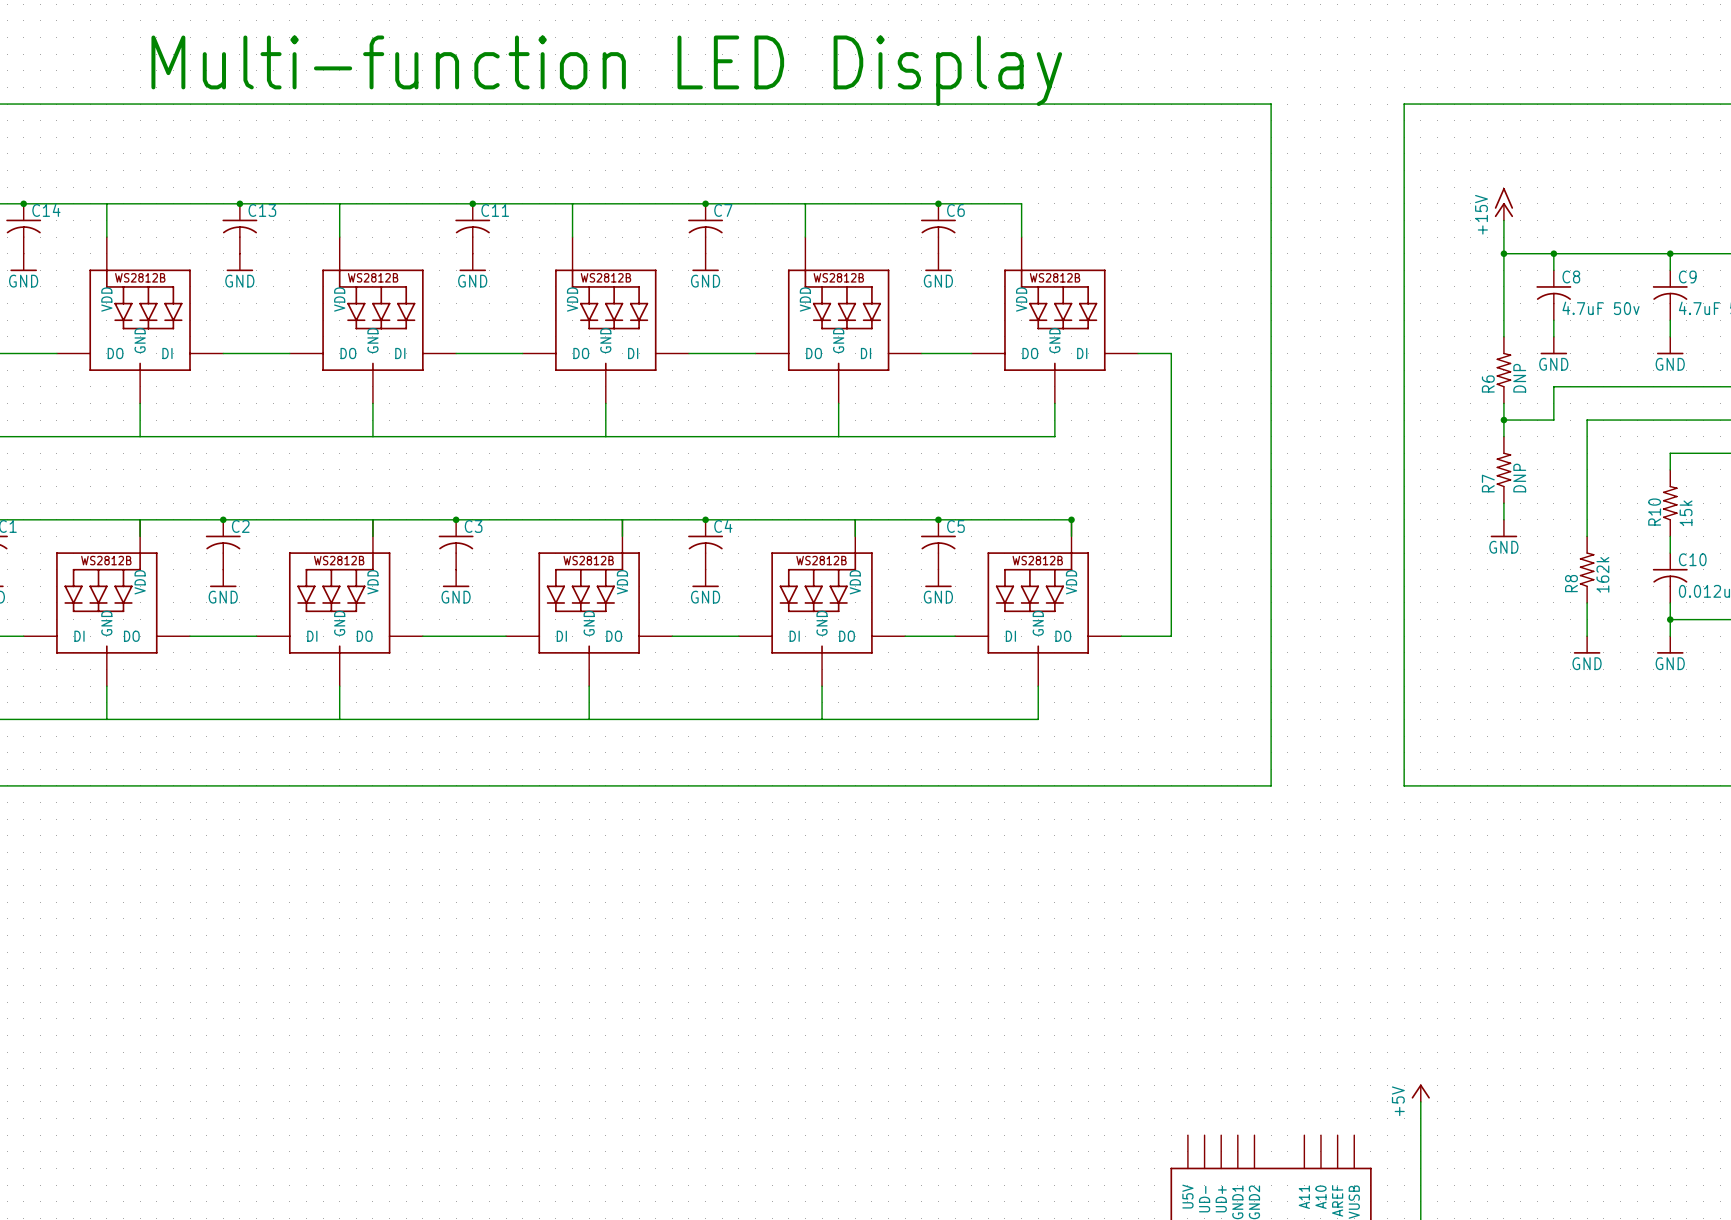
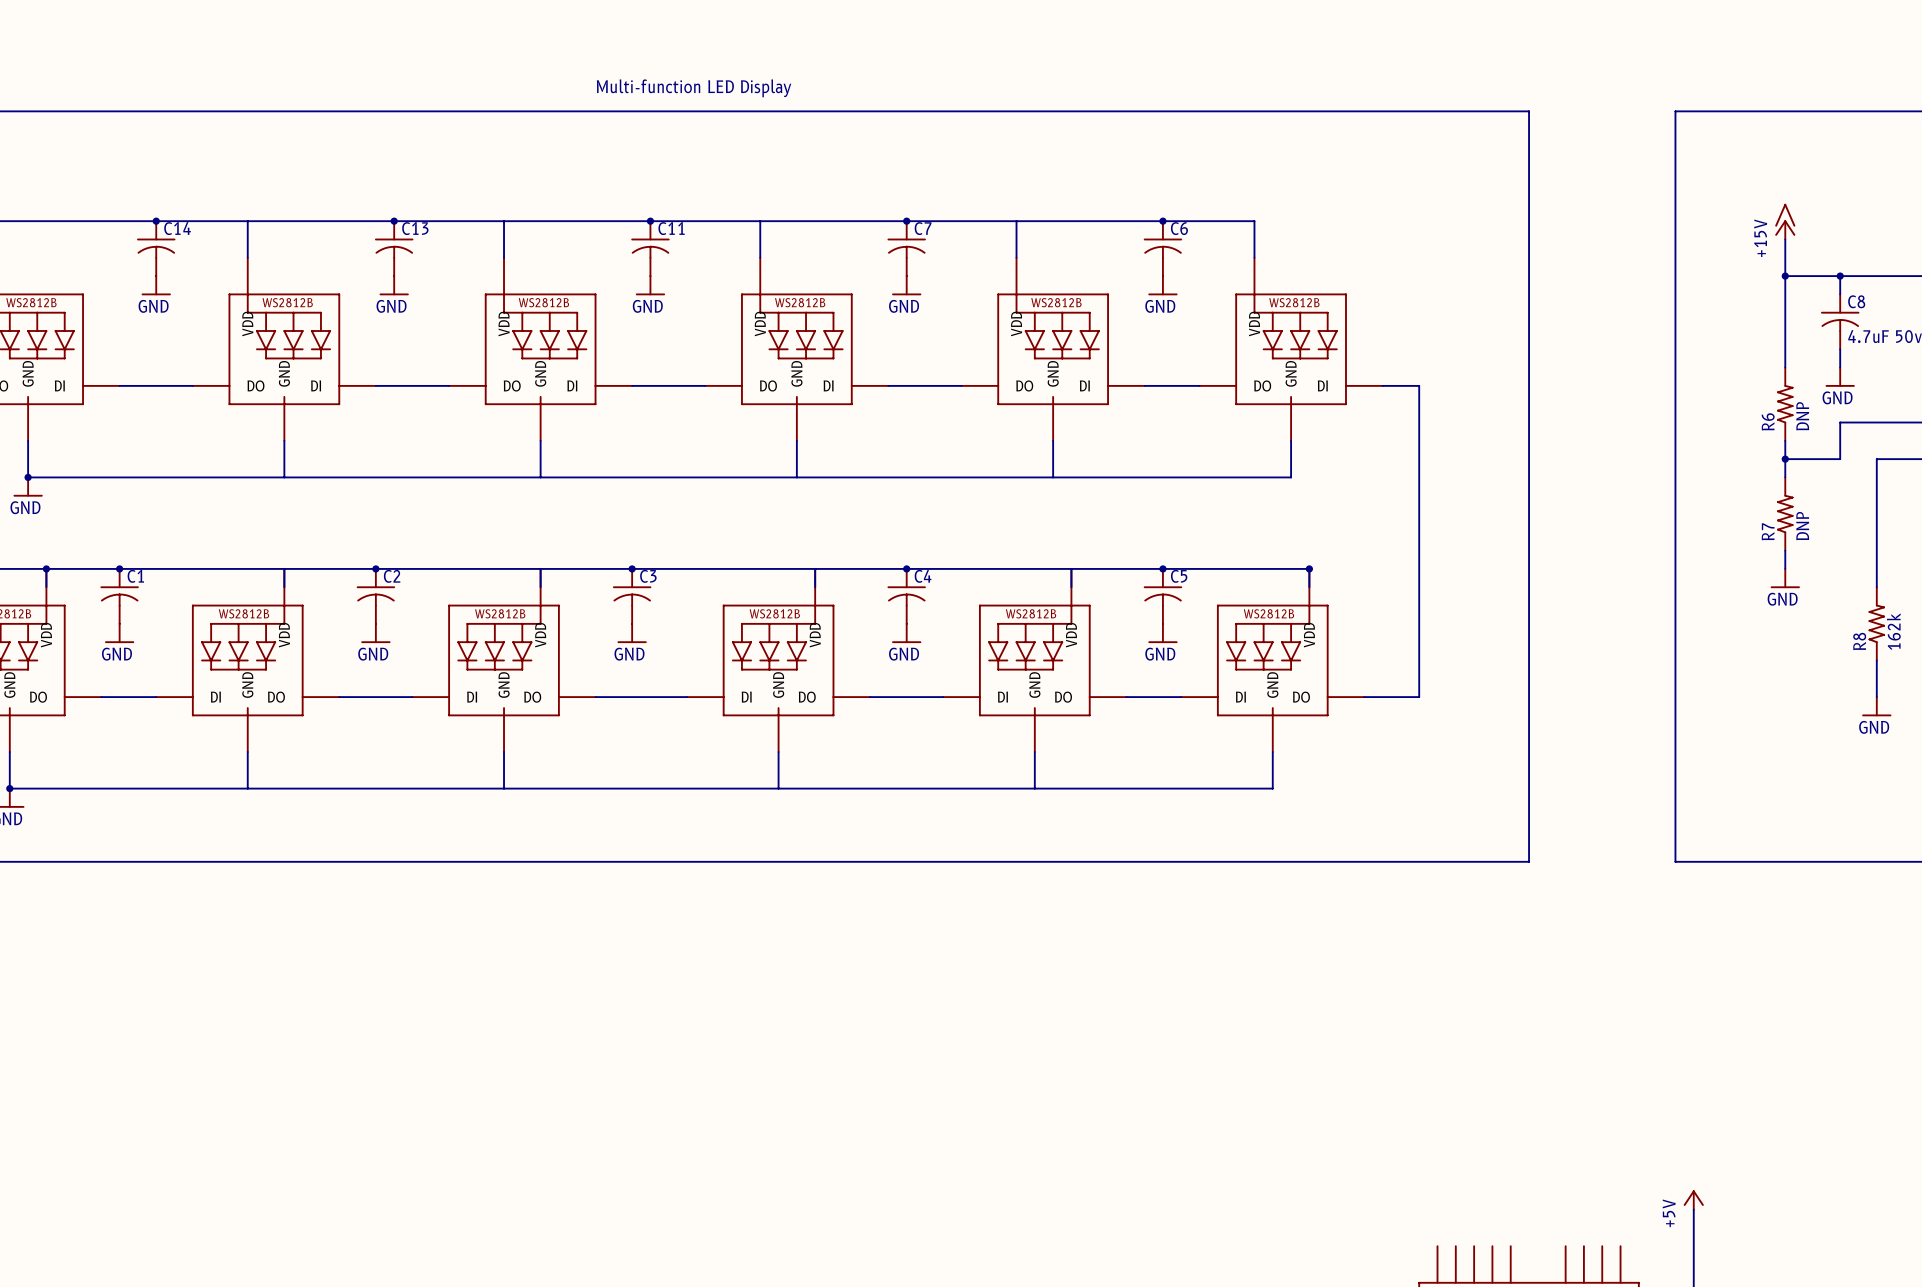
text: Multi-function LED Display (606, 70) -> none
text: none -> Multi-function LED Display (694, 88)

